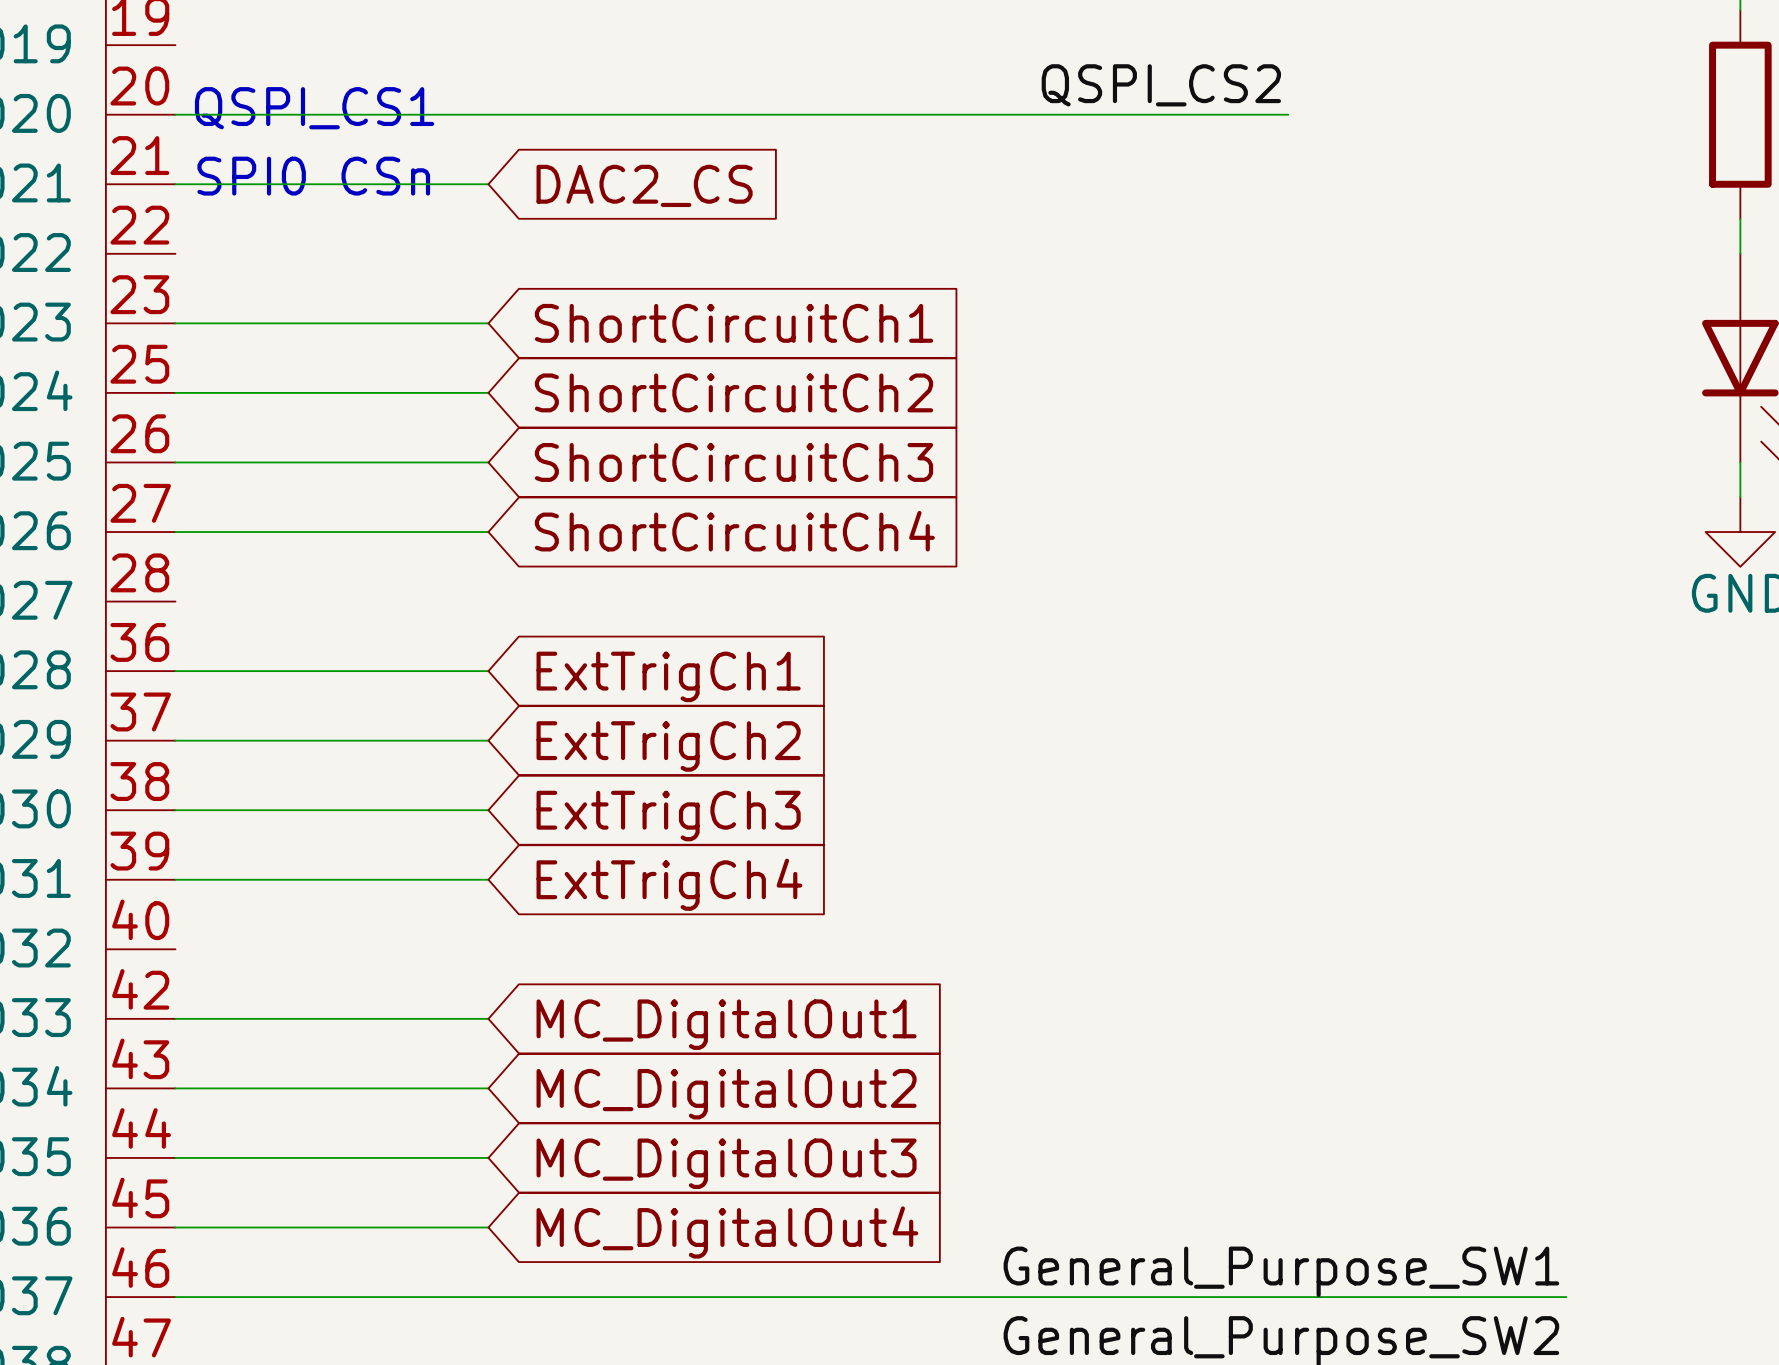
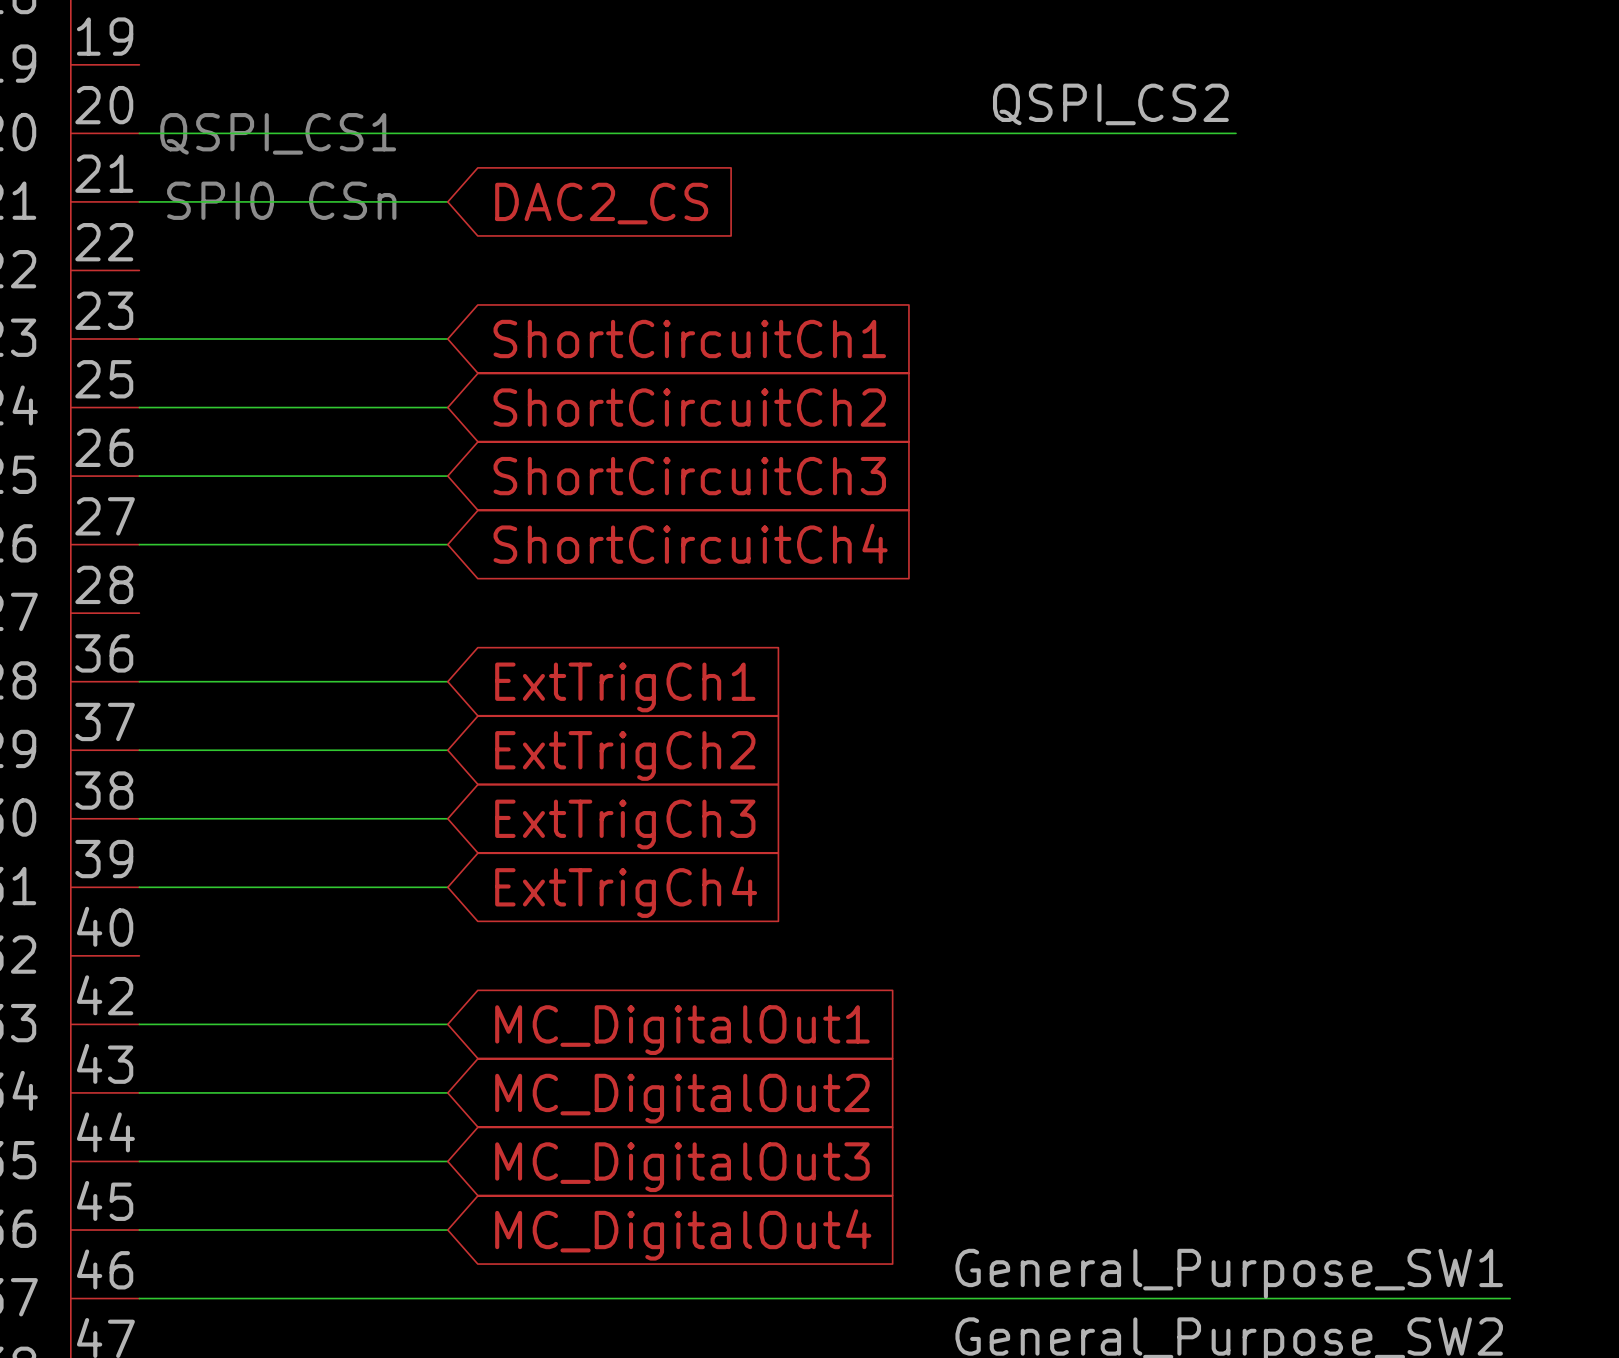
text position: QSPI_CS1 (314, 108) -> QSPI_CS1 (278, 133)
text position: SPI0 CSn (313, 176) -> SPI0 CSn (281, 200)

